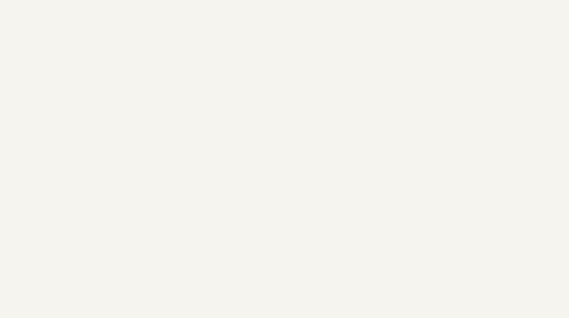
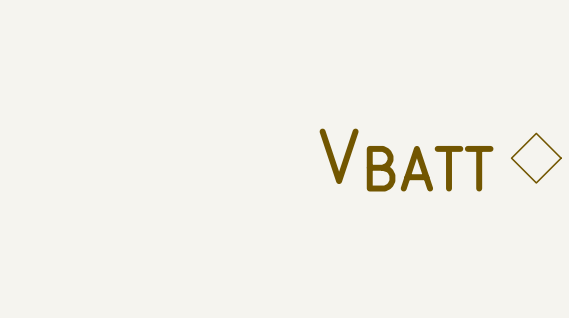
hierarchical label: none -> VBATT (406, 160)

